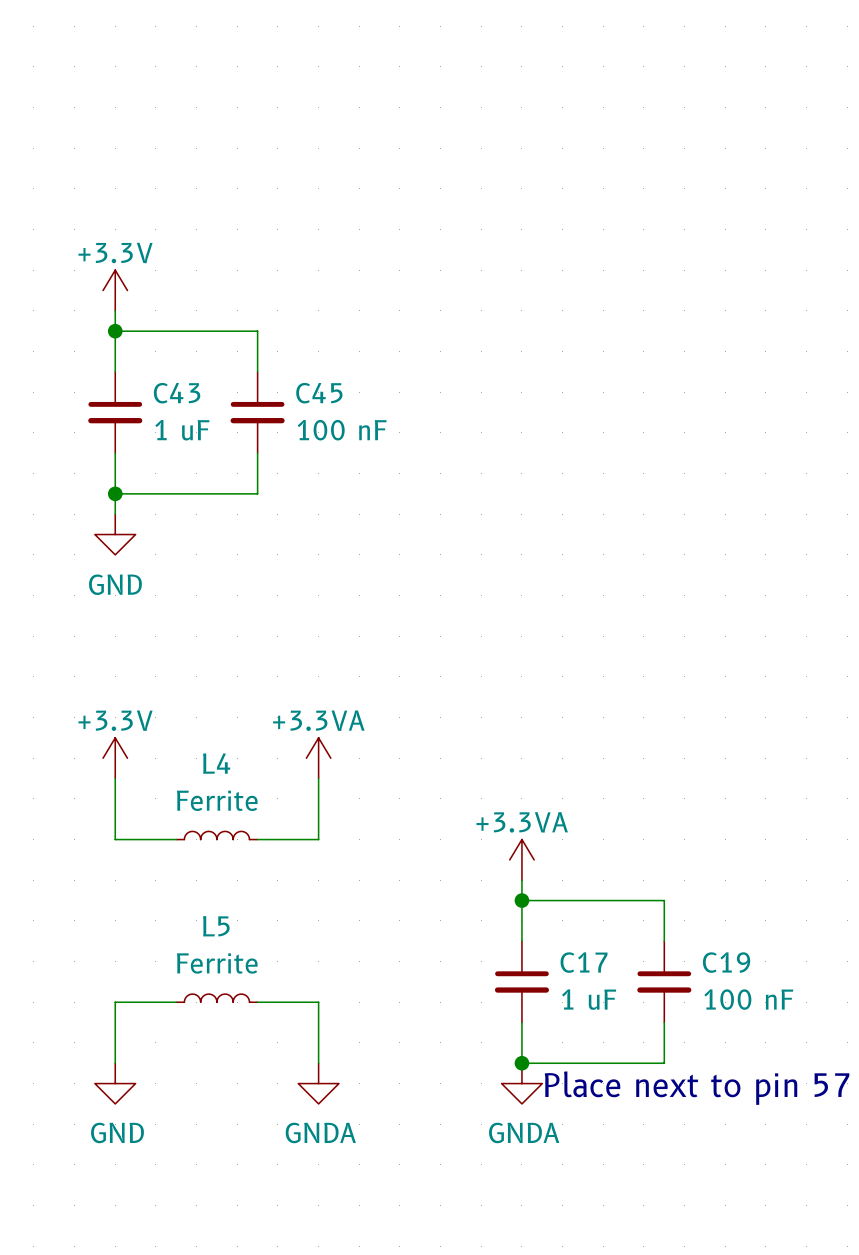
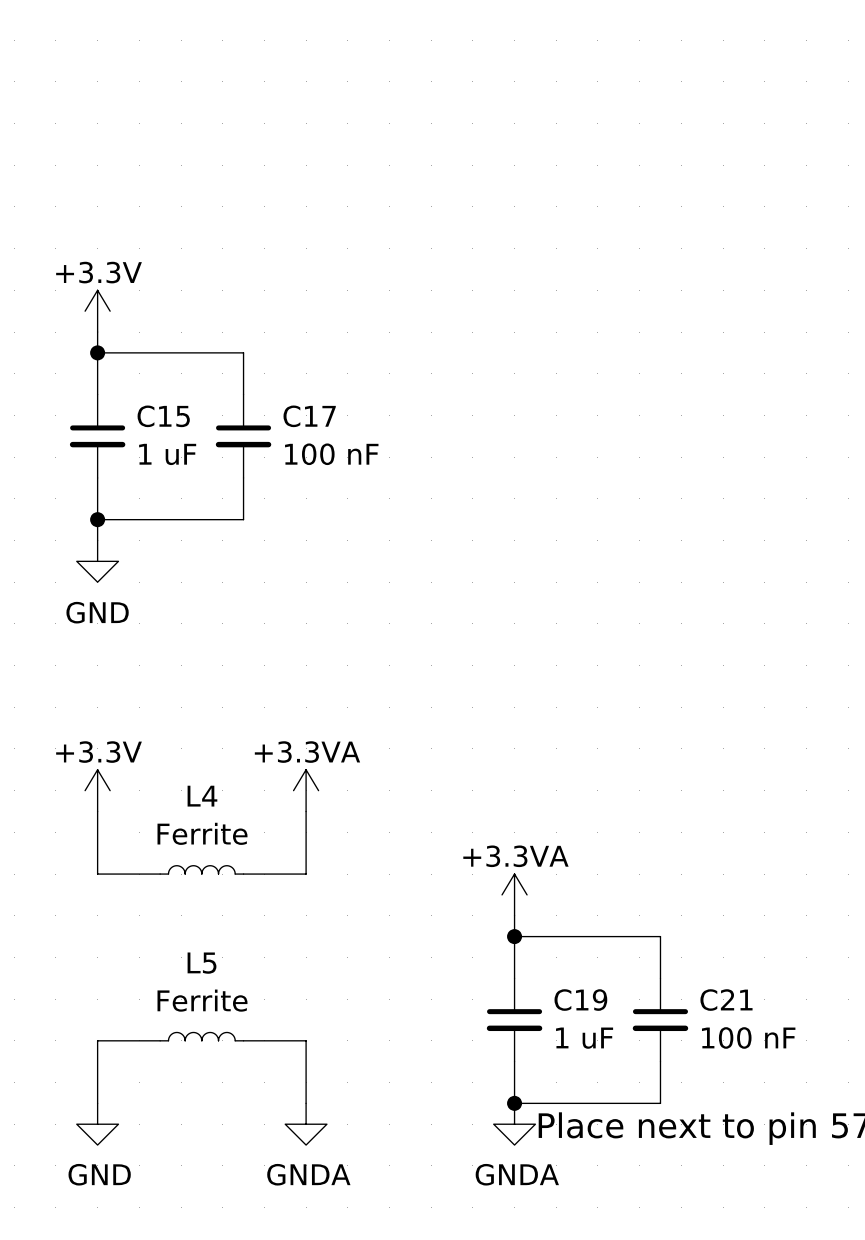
C43 name: C43 (177, 393) -> C15 (163, 416)
C45 name: C45 (319, 393) -> C17 (309, 416)
C17 name: C17 (584, 962) -> C19 (580, 1000)
C19 name: C19 (726, 962) -> C21 (726, 1000)

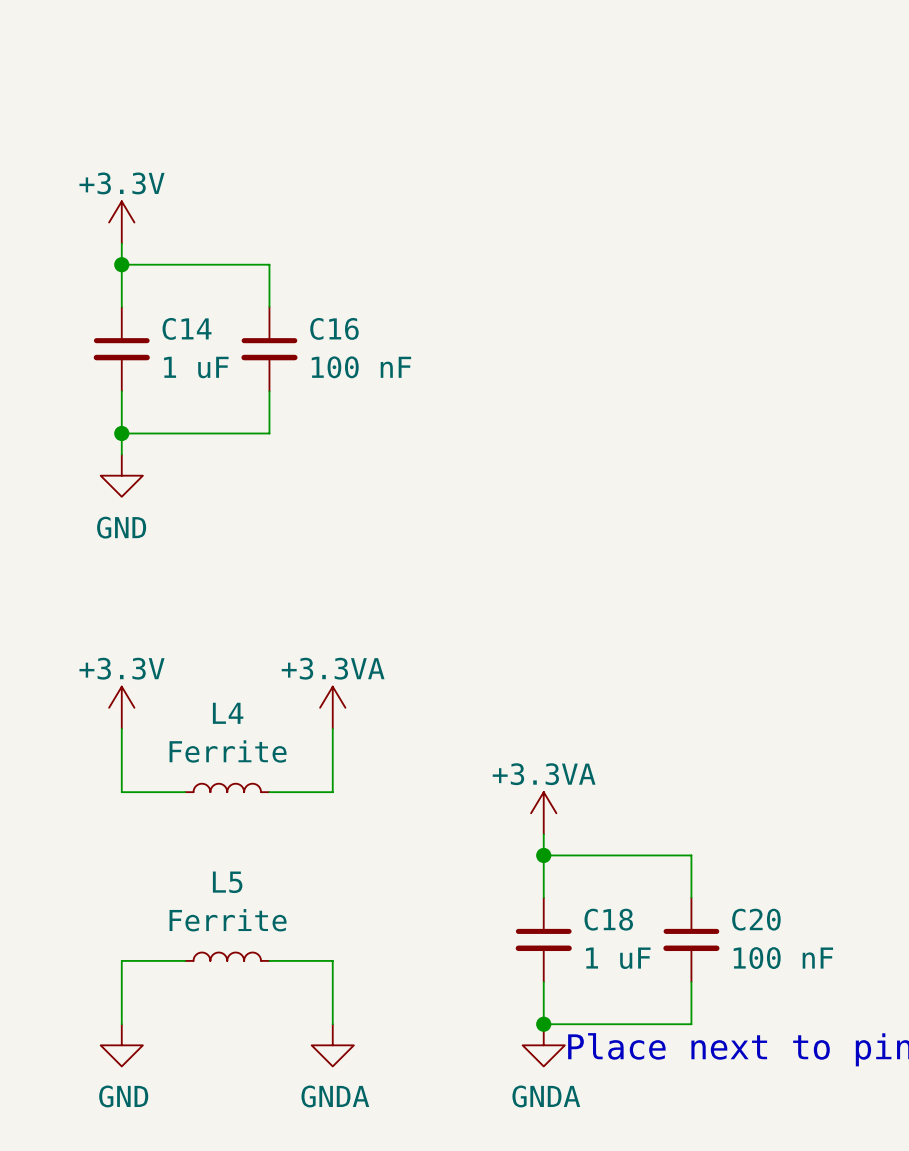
C15 name: C15 (163, 416) -> C14 (187, 328)
C17 name: C17 (309, 416) -> C16 (334, 328)
C19 name: C19 (580, 1000) -> C18 (608, 919)
C21 name: C21 (726, 1000) -> C20 (756, 919)

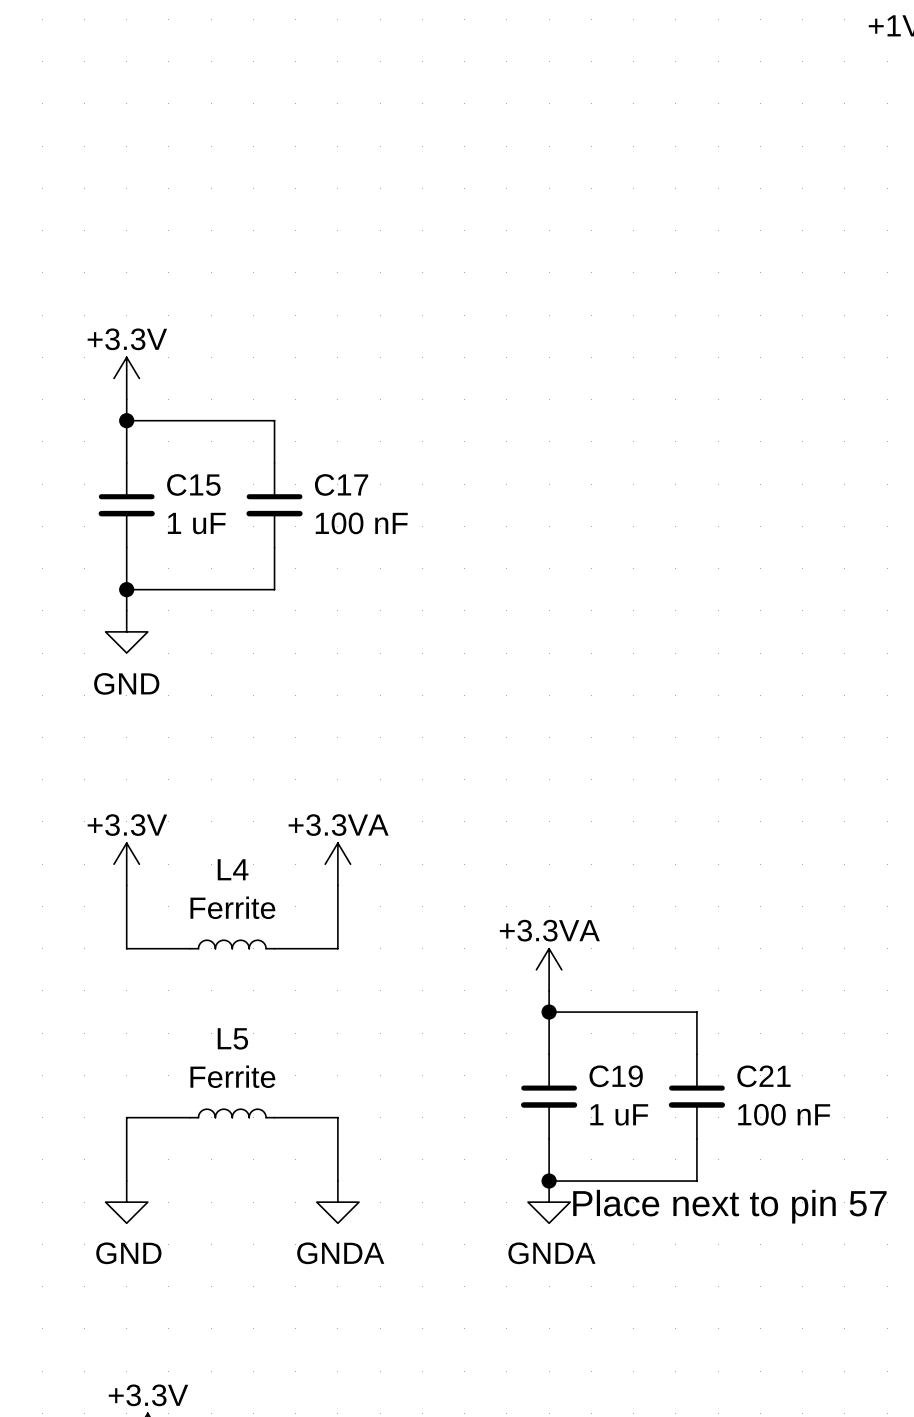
C14 name: C14 (187, 328) -> C15 (193, 484)
C16 name: C16 (334, 328) -> C17 (341, 484)
C18 name: C18 (608, 919) -> C19 (616, 1076)
C20 name: C20 (756, 919) -> C21 (763, 1076)

